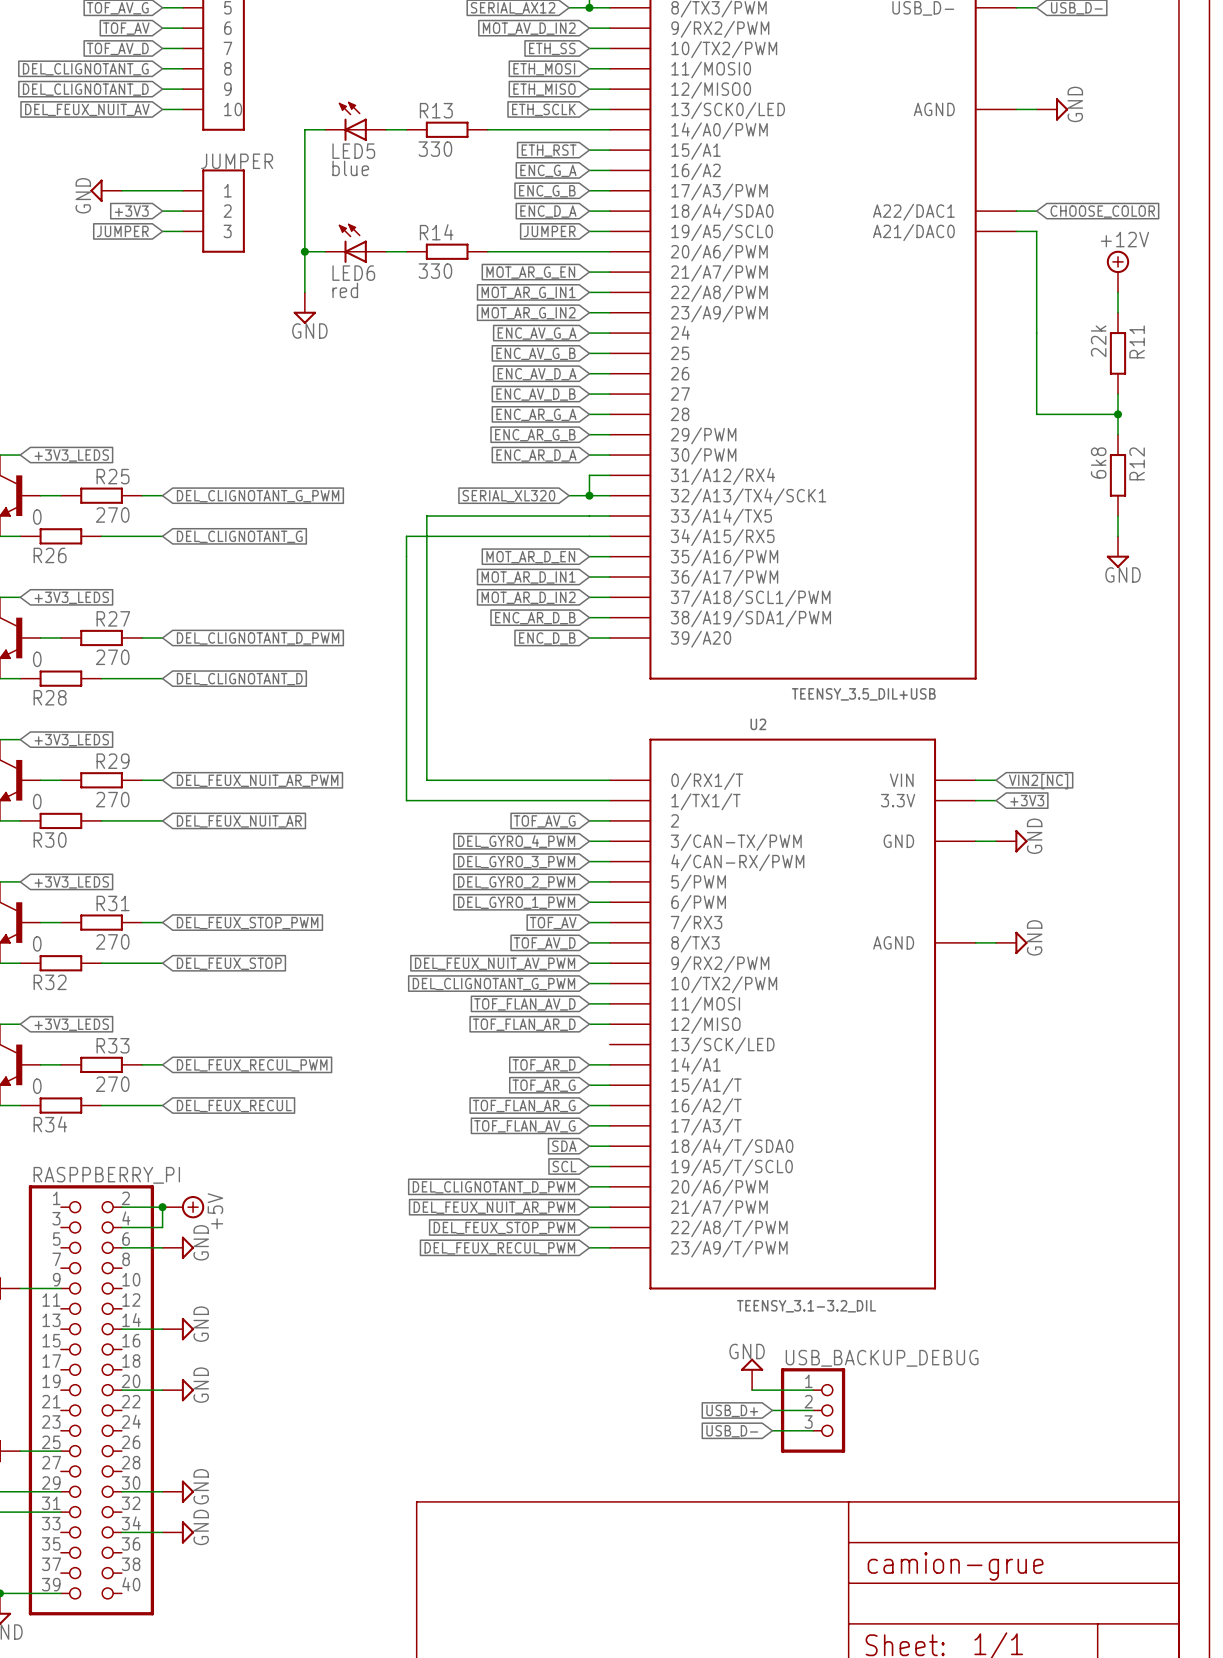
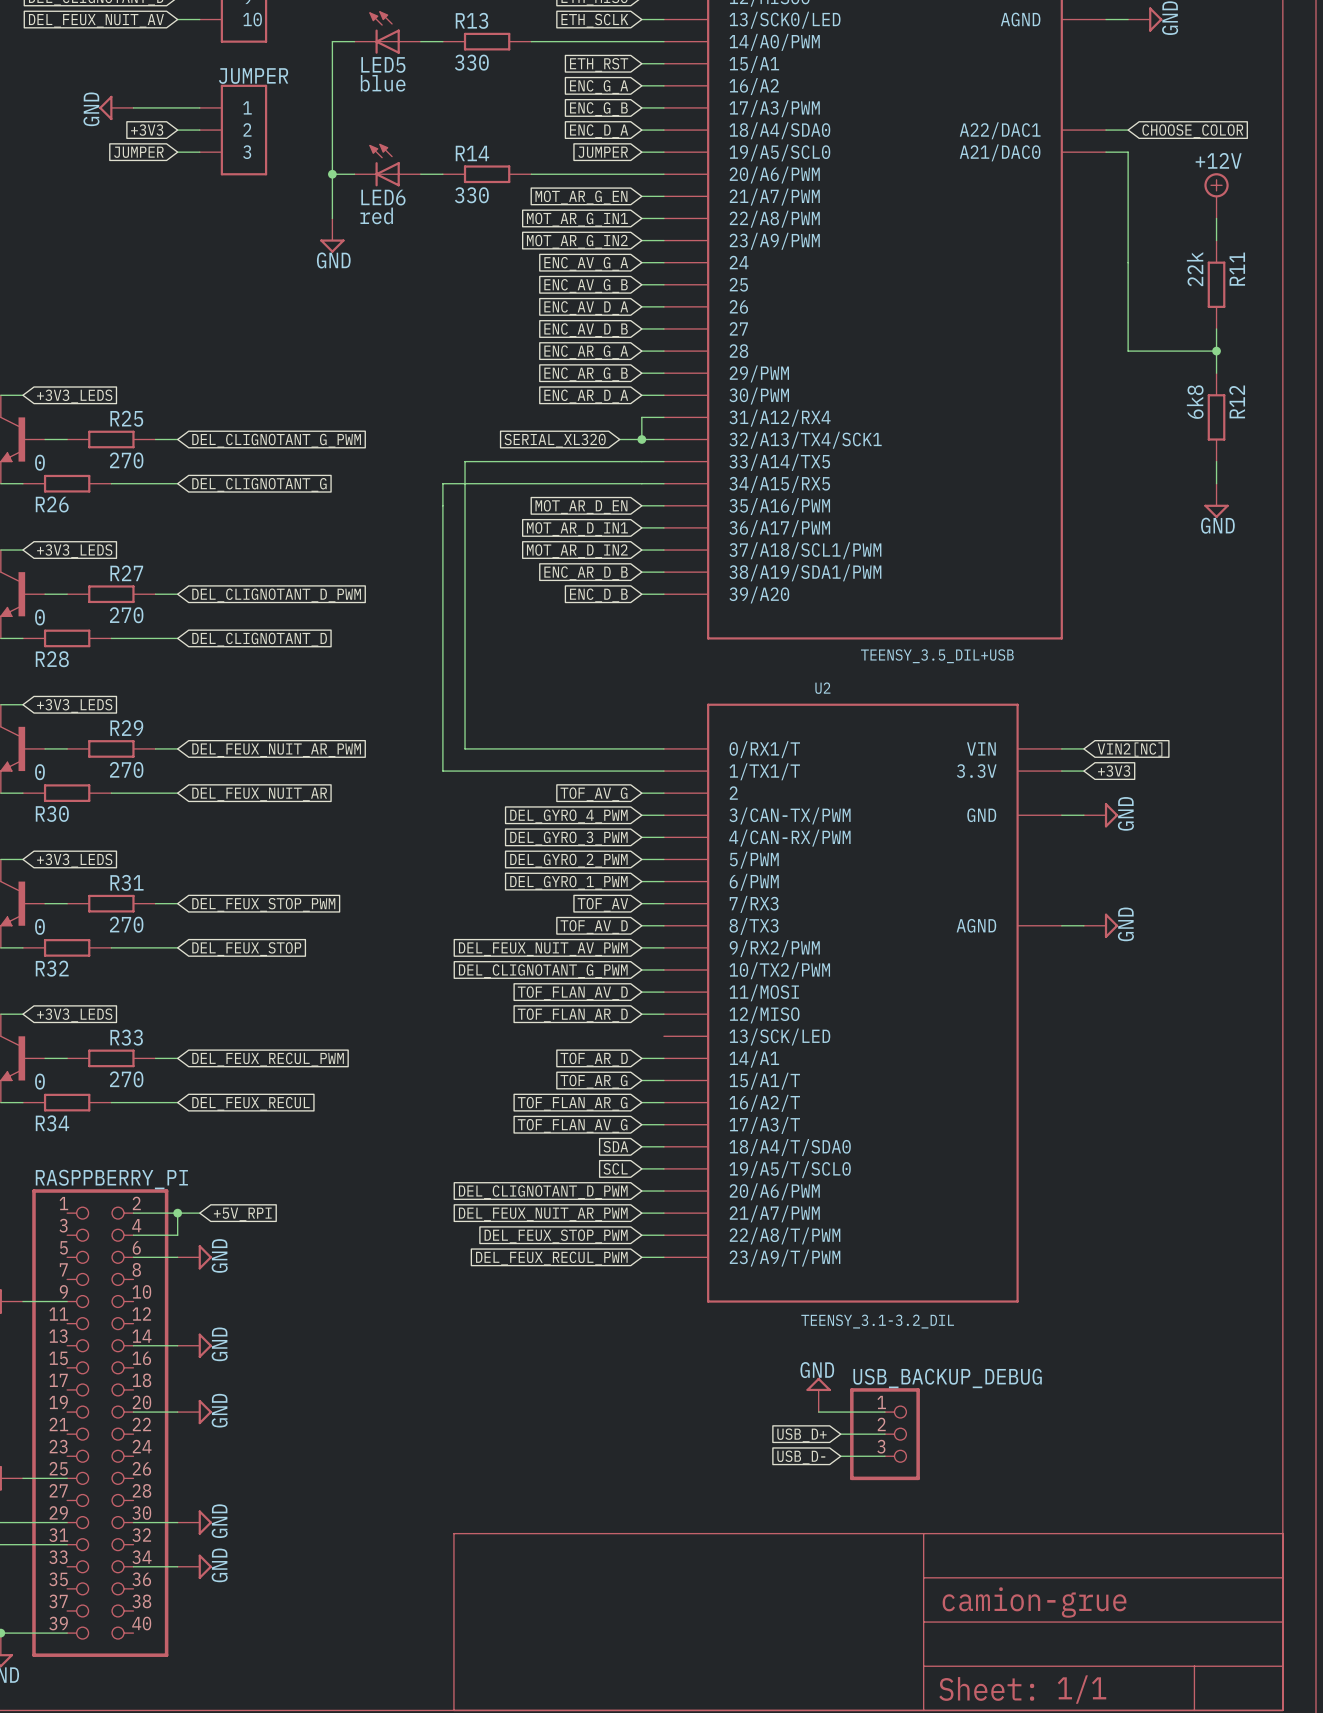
power symbol: +5V (183, 1207) -> none
global label: none -> +5V_RPI (242, 1214)

